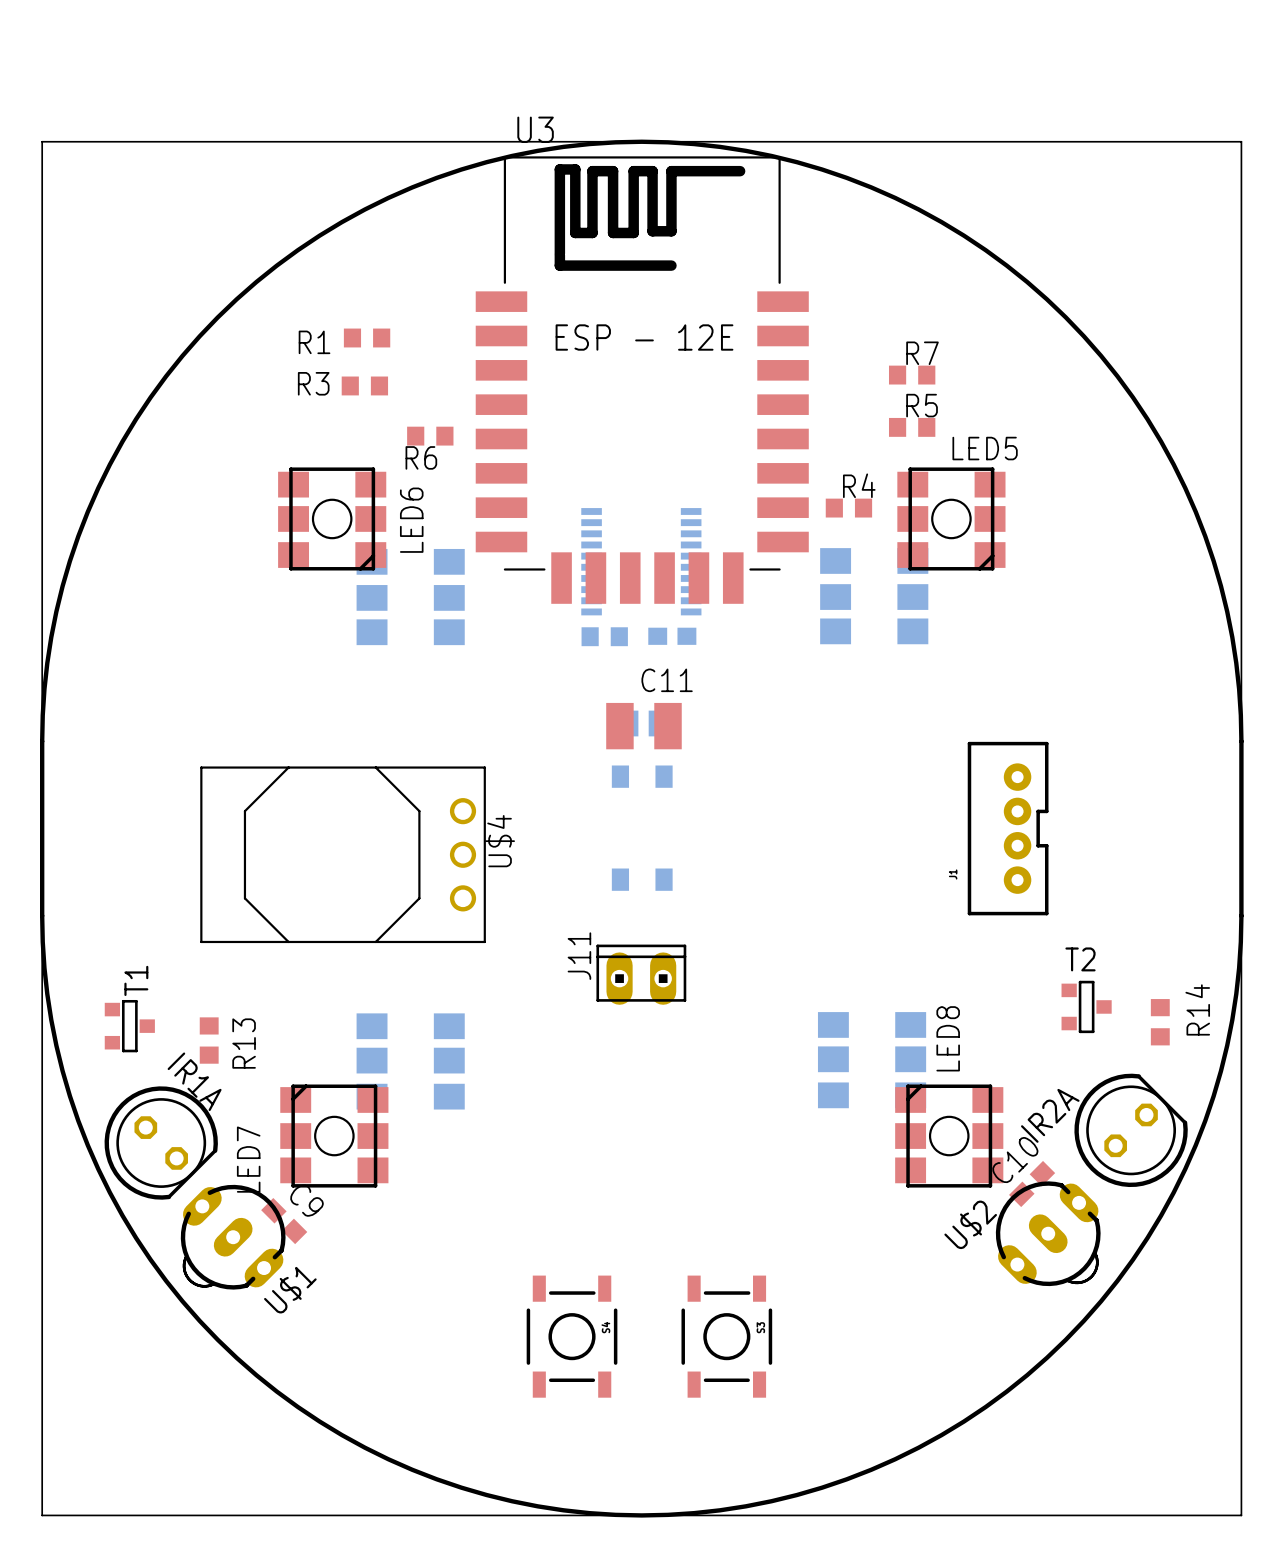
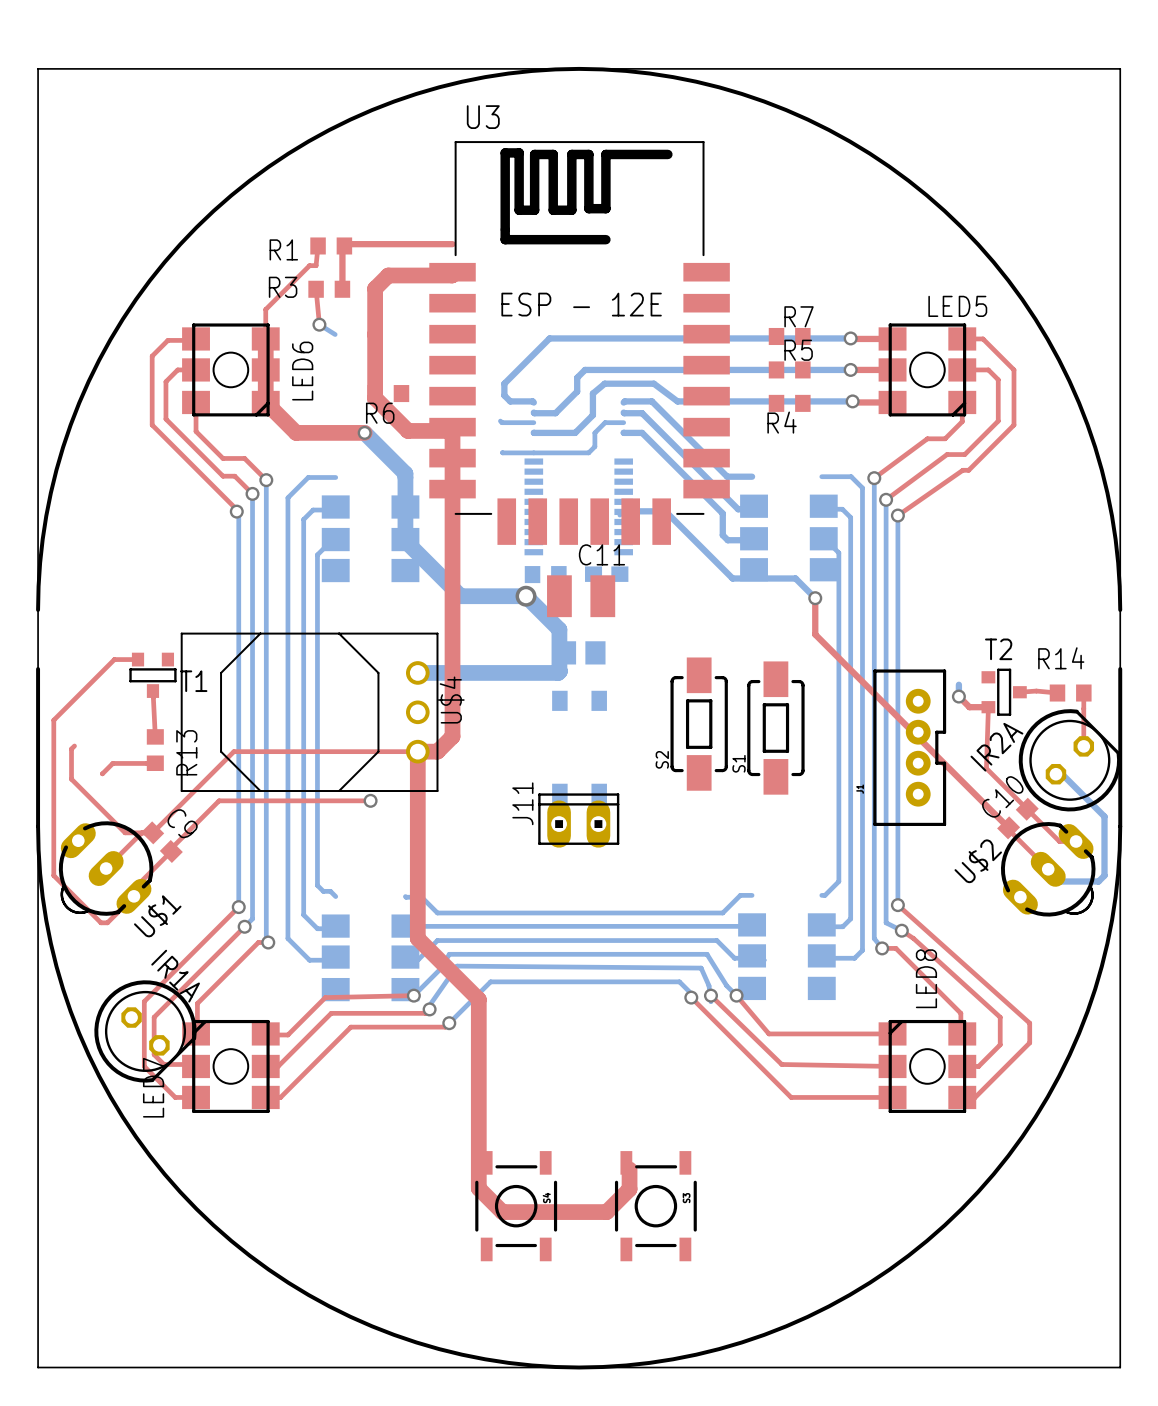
board edge: (42, 141) (1241, 141) -> (38, 127) (38, 68) (1120, 68) (1120, 127)
top track: none -> (452, 244) (344, 244) (342, 245) (342, 289)
top track: none -> (318, 245) (316, 265) (309, 265) (265, 309) (265, 402) (296, 432) (364, 432)
top track: none -> (452, 275) (388, 275) (375, 288) (375, 398) (407, 430) (452, 430) (452, 736) (437, 751) (417, 751)
top track: none -> (316, 289) (319, 324)
R1 position: (367, 338) -> (331, 245)
bottom track: none -> (319, 324) (335, 334)
via: none -> (319, 324)
top track: none -> (196, 338) (167, 340) (152, 356) (152, 425) (236, 511)
R7 position: (912, 375) -> (789, 336)
top track: none -> (850, 338) (892, 338)
bottom track: none -> (850, 338) (549, 338) (504, 383) (504, 395) (510, 401) (533, 402)
via: none -> (850, 338)
top track: none -> (962, 338) (983, 338) (1013, 369) (1013, 425) (968, 470) (962, 470) (897, 515)
R3 position: (364, 385) -> (329, 289)
top track: none -> (196, 369) (177, 369) (165, 381) (165, 419) (223, 476) (234, 476) (252, 493)
top track: none -> (850, 369) (892, 369)
bottom track: none -> (850, 369) (585, 369) (577, 377) (577, 391) (555, 413) (533, 412)
via: none -> (850, 369)
top track: none -> (962, 369) (988, 369) (998, 379) (998, 421) (964, 454) (947, 454) (886, 499)
R5 position: (912, 427) -> (789, 369)
top track: none -> (852, 401) (892, 402)
bottom track: none -> (852, 401) (677, 401) (653, 383) (604, 383) (592, 393) (592, 415) (575, 432) (533, 432)
via: none -> (852, 401)
top track: none -> (196, 402) (196, 431) (223, 458) (244, 458) (266, 480)
bottom track: none -> (623, 402) (651, 401) (727, 476) (752, 476)
top track: none -> (962, 402) (962, 421) (945, 438) (927, 438) (874, 478)
bottom track: none -> (623, 412) (642, 413) (738, 509) (752, 509)
bottom track: none -> (500, 421) (502, 422) (533, 422)
bottom track: none -> (623, 422) (605, 422) (594, 432) (594, 446) (588, 452) (502, 452)
bottom track: none -> (364, 432) (405, 473) (405, 541) (460, 596) (526, 596) (559, 629) (559, 671) (558, 672) (417, 672)
via: none -> (364, 432)
bottom track: none -> (623, 432) (642, 432) (722, 513) (722, 535) (727, 540) (752, 540)
R4 name position: R4 (859, 485) -> R4 (782, 422)
R4 position: (848, 508) -> (789, 403)
LED6 position: (332, 518) -> (230, 369)
LED5 position: (951, 518) -> (927, 369)
bottom track: none -> (821, 476) (851, 476) (862, 487) (862, 950) (854, 958) (821, 958)
bottom track: none -> (335, 477) (308, 477) (287, 497) (287, 938) (309, 960) (335, 960)
bottom track: none -> (874, 478) (874, 938) (882, 948)
via: none -> (874, 478)
bottom track: none -> (266, 480) (266, 940) (268, 942)
via: none -> (266, 480)
bottom track: none -> (252, 493) (252, 918) (244, 926)
via: none -> (252, 493)
bottom track: none -> (886, 499) (886, 922) (901, 930)
via: none -> (886, 499)
bottom track: none -> (821, 509) (842, 509) (850, 517) (850, 918) (842, 926) (821, 926)
bottom track: none -> (335, 510) (313, 510) (303, 519) (303, 914) (317, 928) (335, 927)
bottom track: none -> (236, 511) (238, 513) (238, 907)
via: none -> (236, 511)
bottom track: none -> (619, 515) (623, 511) (665, 511) (732, 578) (795, 578) (815, 598)
bottom track: none -> (897, 515) (897, 905)
via: none -> (897, 515)
bottom track: none -> (821, 540) (824, 543) (829, 543) (838, 552) (838, 881) (825, 895) (821, 895)
bottom track: none -> (335, 541) (331, 541) (317, 554) (317, 885) (323, 891) (330, 891) (335, 896)
via: none -> (526, 596)
top track: none -> (815, 598) (815, 634) (1048, 869)
via: none -> (815, 598)
C11 position: (643, 726) -> (581, 596)
top track: none -> (138, 659) (114, 659) (53, 720) (53, 875) (101, 922) (107, 922) (133, 896) (133, 888) (219, 800) (370, 800)
board edge: (42, 741) (44, 689) (51, 637) (62, 586) (87, 511) (109, 464) (150, 397) (182, 355) (217, 317) (256, 282) (297, 250) (364, 209) (412, 187) (486, 162) (537, 150) (589, 144) (641, 141) (694, 144) (745, 150) (796, 162) (871, 187) (918, 209) (985, 250) (1027, 282) (1065, 317) (1101, 355) (1132, 397) (1173, 464) (1195, 511) (1220, 586) (1232, 637) (1239, 689) (1241, 741) -> (38, 609) (40, 562) (46, 516) (56, 469) (79, 402) (99, 360) (135, 299) (164, 262) (196, 227) (231, 195) (268, 166) (329, 130) (372, 110) (439, 87) (485, 77) (531, 70) (579, 68) (626, 70) (673, 77) (719, 87) (786, 110) (829, 130) (889, 166) (926, 195) (961, 227) (993, 262) (1022, 299) (1059, 360) (1079, 402) (1101, 469) (1112, 516) (1118, 562) (1120, 609)
bottom track: none -> (958, 684) (958, 696)
top track: none -> (152, 691) (155, 736)
top track: none -> (1019, 692) (1036, 691) (1057, 693)
top track: none -> (1083, 693) (1083, 746)
top track: none -> (958, 696) (969, 707) (988, 707) (986, 768) (1059, 841) (1076, 841)
via: none -> (958, 696)
S2: none -> (699, 724)
S1: none -> (775, 728)
top track: none -> (74, 746) (71, 749) (71, 779) (125, 832) (152, 832) (233, 751) (417, 751)
top track: none -> (417, 751) (417, 938) (478, 999) (478, 1188) (502, 1212) (606, 1212) (629, 1189) (629, 1169)
top track: none -> (155, 763) (112, 763) (102, 773)
U$4 position: (343, 854) -> (309, 712)
bottom track: none -> (1055, 774) (1062, 774) (1104, 816) (1104, 875) (1098, 881) (1060, 881) (1048, 869)
via: none -> (370, 800)
top track: none -> (141, 832) (106, 868)
J11 position: (641, 974) -> (578, 820)
bottom track: none -> (752, 895) (740, 895) (722, 912) (437, 912) (421, 897) (405, 896)
top track: none -> (897, 905) (1029, 1023) (1029, 1042) (974, 1097) (962, 1097)
via: none -> (897, 905)
top track: none -> (238, 907) (144, 1001) (144, 1066) (175, 1097) (196, 1097)
via: none -> (238, 907)
T2 position: (1086, 1006) -> (1004, 692)
R14 name position: R14 (1197, 1009) -> R14 (1061, 658)
R14 rotation: 0° (1160, 1022) -> 90° clockwise (1070, 693)
R14 position: (1160, 1022) -> (1070, 693)
T1 rotation: 0° (129, 1026) -> 90° clockwise (152, 675)
T1 position: (129, 1026) -> (152, 675)
bottom track: none -> (752, 926) (405, 927)
top track: none -> (244, 926) (154, 1017) (154, 1054) (163, 1064) (194, 1064) (196, 1066)
via: none -> (244, 926)
top track: none -> (901, 930) (913, 938) (1000, 1017) (1000, 1044) (978, 1066) (962, 1066)
via: none -> (901, 930)
R13 position: (209, 1040) -> (155, 750)
top track: none -> (268, 942) (258, 942) (197, 1003) (196, 1033)
via: none -> (268, 942)
top track: none -> (882, 948) (895, 948) (960, 1013) (962, 1033)
via: none -> (882, 948)
bottom track: none -> (752, 958) (764, 960) (762, 958) (734, 958) (716, 940) (437, 940) (417, 960) (405, 960)
bottom track: none -> (443, 966) (413, 995)
bottom track: none -> (441, 968) (449, 954) (707, 954) (726, 985) (736, 995)
top track: none -> (413, 995) (325, 997) (287, 1034) (265, 1033)
via: none -> (413, 995)
top track: none -> (710, 995) (781, 1064) (892, 1066)
bottom track: none -> (710, 995) (710, 1001) (709, 985) (701, 968) (457, 966) (429, 1005) (429, 1009)
via: none -> (710, 995)
top track: none -> (736, 995) (768, 1033) (892, 1033)
via: none -> (736, 995)
top track: none -> (691, 997) (791, 1097) (892, 1097)
bottom track: none -> (691, 997) (691, 993) (679, 981) (490, 981) (449, 1023)
via: none -> (691, 997)
top track: none -> (429, 1009) (425, 1013) (331, 1013) (278, 1066) (265, 1066)
via: none -> (429, 1009)
IR2A position: (1131, 1130) -> (1069, 760)
top track: none -> (449, 1023) (445, 1027) (350, 1027) (280, 1097) (265, 1097)
via: none -> (449, 1023)
LED7 position: (334, 1136) -> (230, 1066)
LED8 position: (949, 1136) -> (927, 1066)
U$1 footprint: [180, 1184, 286, 1290] -> [58, 821, 154, 916]
C10 position: (1032, 1184) -> (1017, 818)
C9 position: (284, 1221) -> (162, 842)
U$2 position: (1048, 1233) -> (1048, 869)

